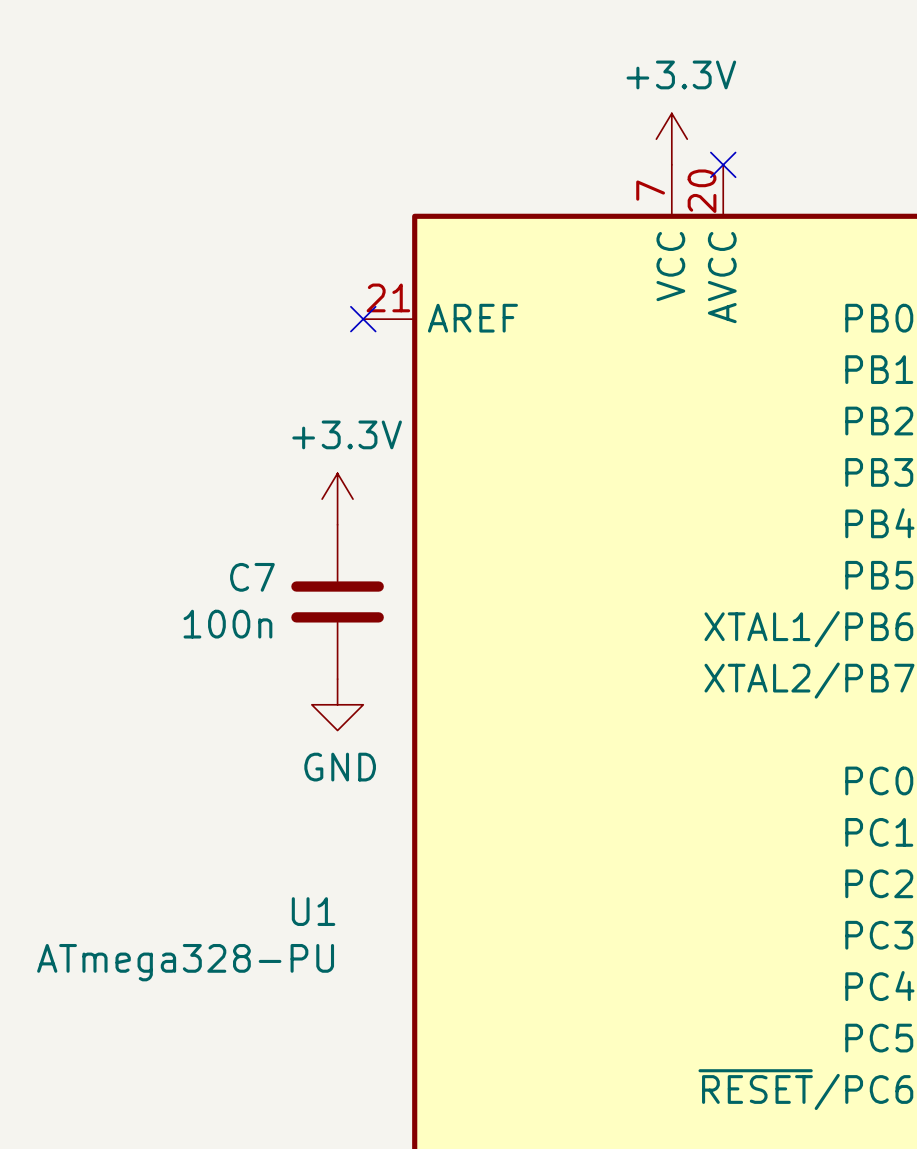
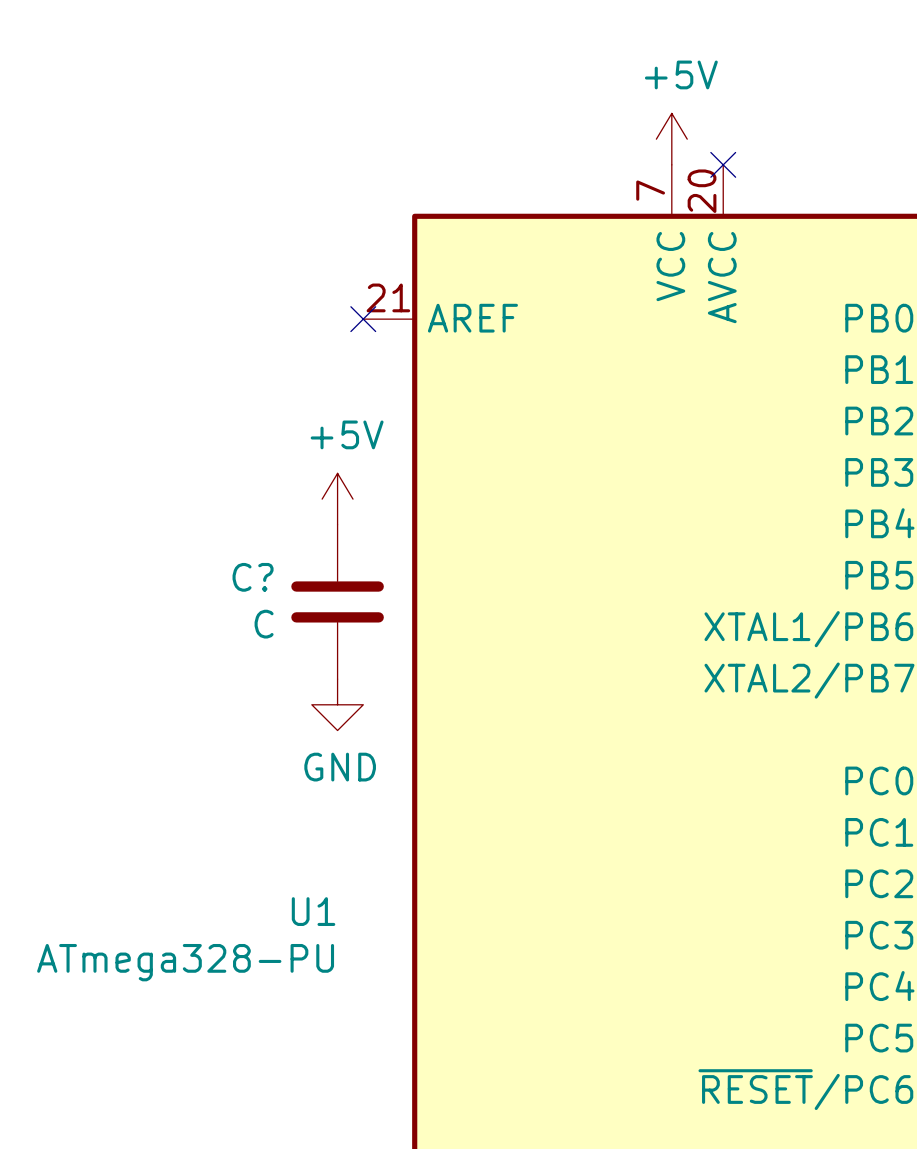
power symbol: +3.3V (671, 139) -> +5V (671, 139)
power symbol: +3.3V (337, 499) -> +5V (337, 499)
C7 name: C7 (252, 577) -> C? (253, 577)
C7 value: 100n (227, 624) -> C (264, 624)

